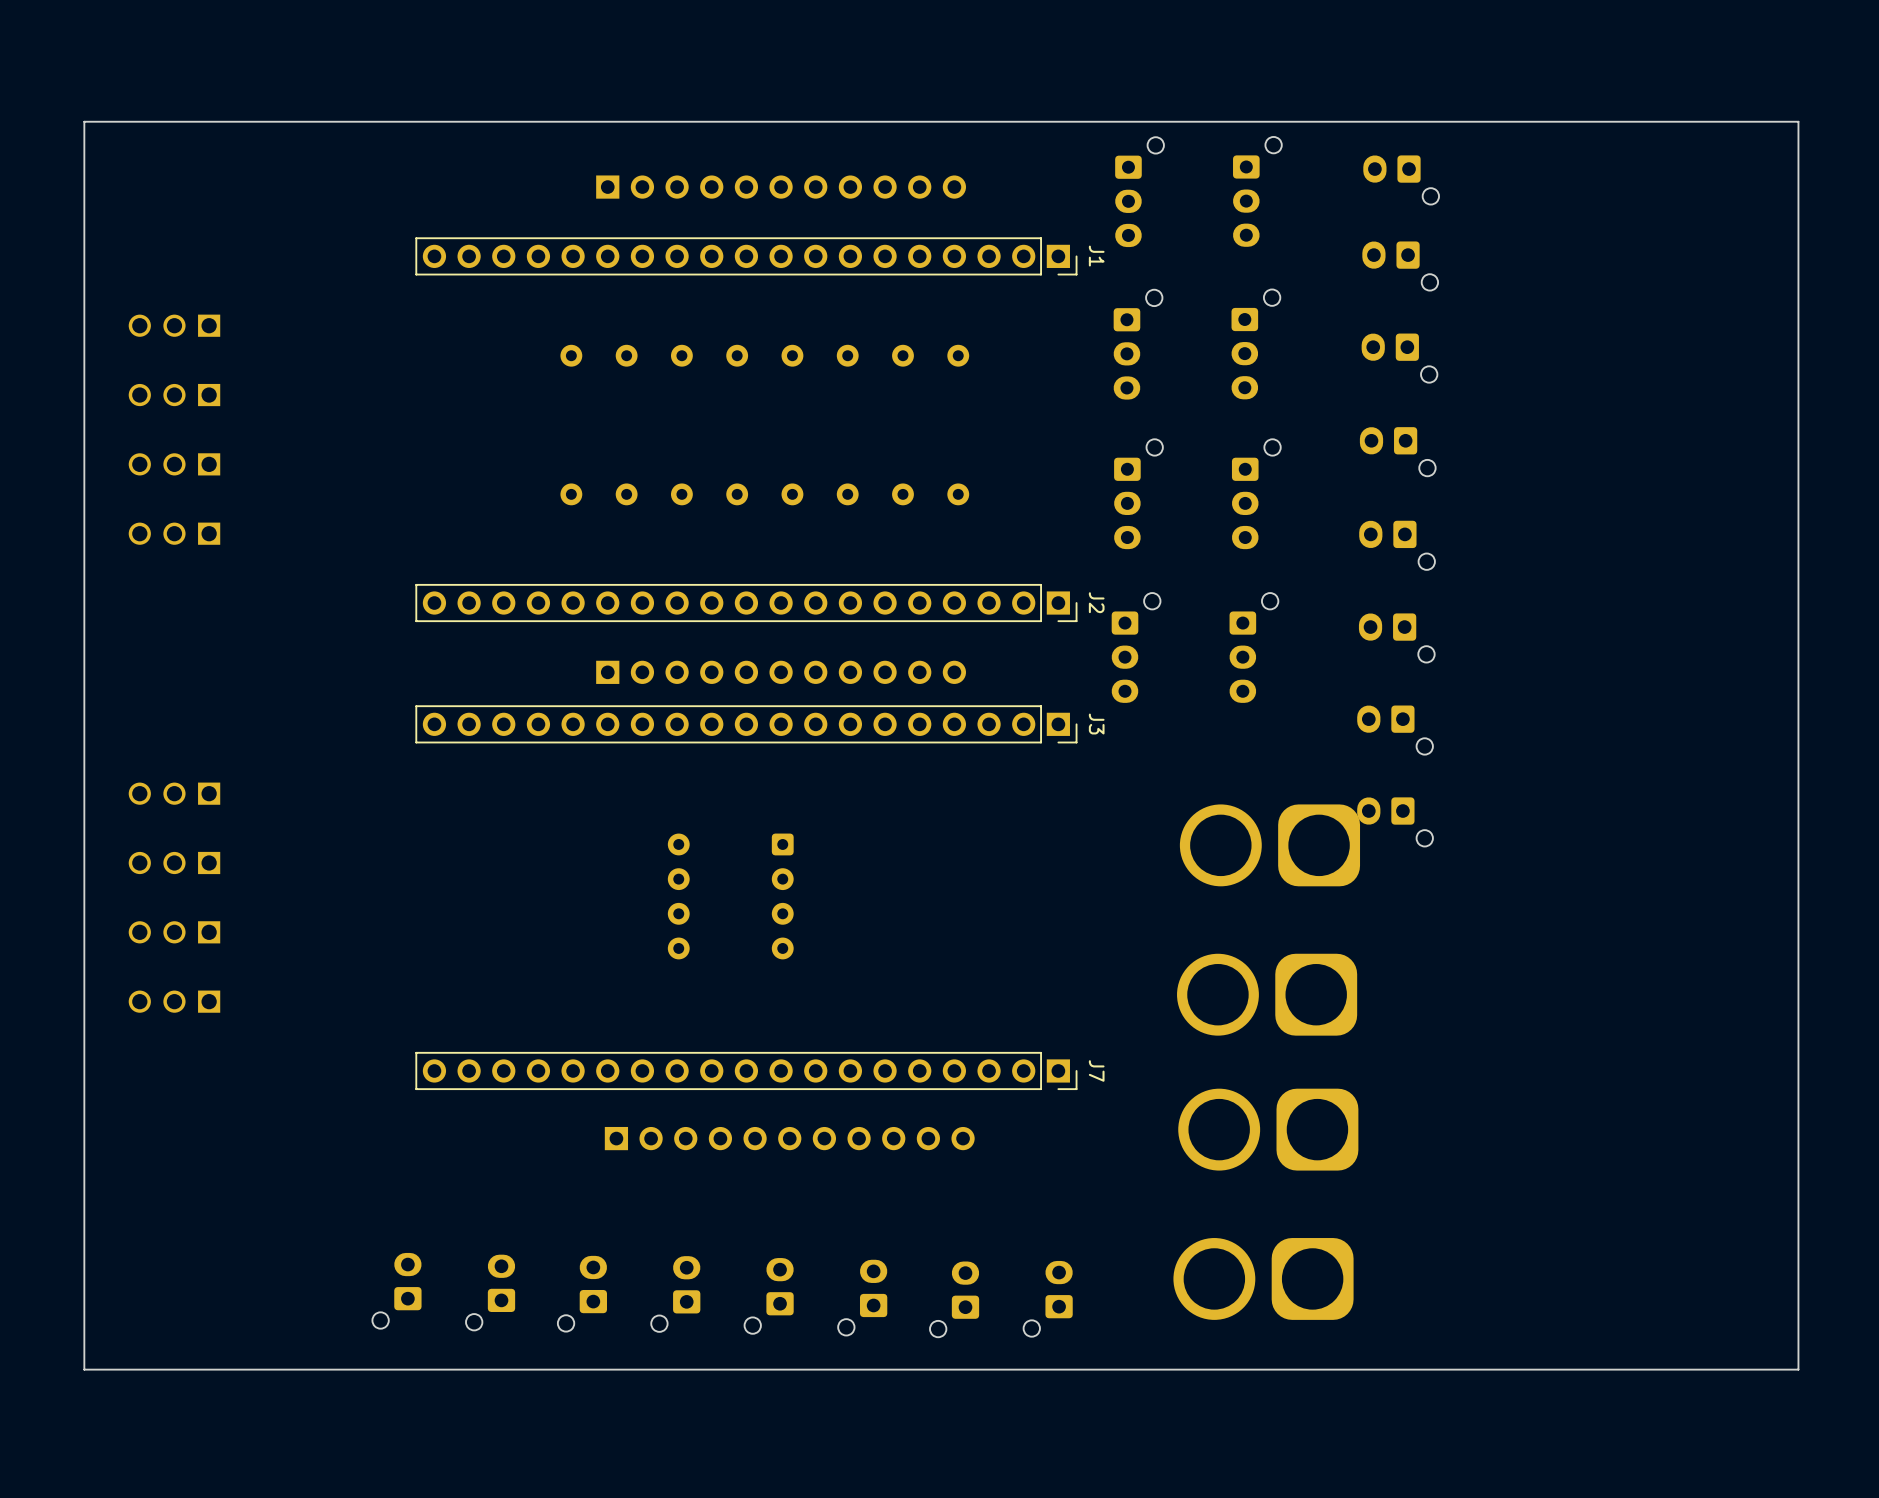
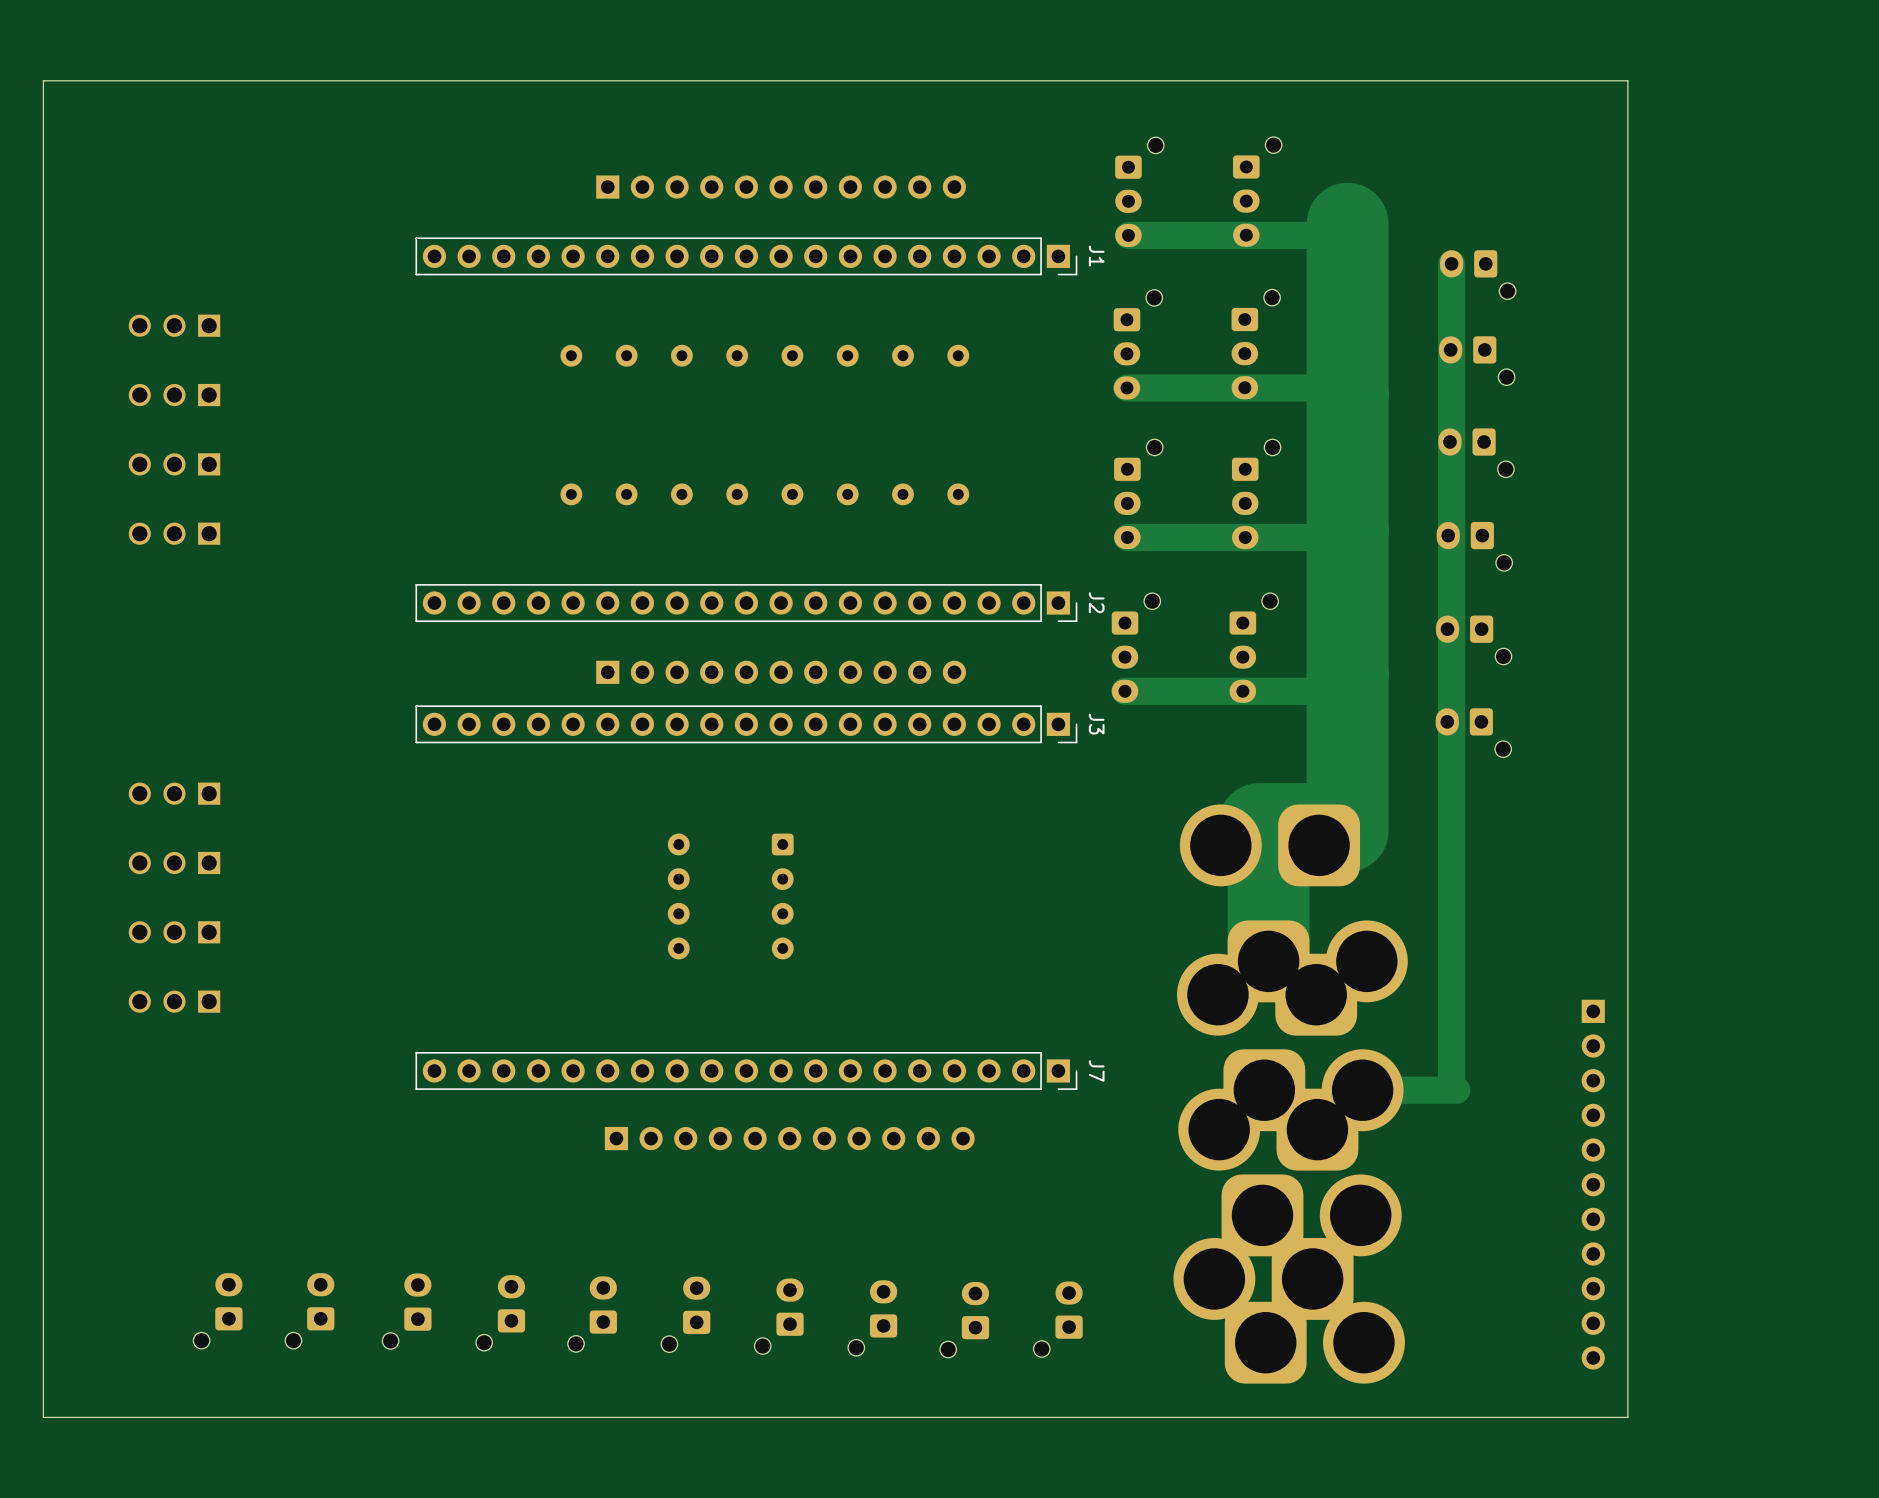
board edge: (1798, 121) (84, 121) (84, 1369) (1798, 1369) (1798, 121) -> (1627, 80) (1627, 1417) (43, 1417) (43, 80) (1627, 80)
part: (1401, 179) -> none
track: none -> (1354, 216) (1335, 235) (1128, 235)
track: none -> (1347, 223) (1347, 830) (1340, 824) (1258, 824) (1268, 833) (1268, 961)
track: none -> (1451, 263) (1451, 1078) (1456, 1083) (1456, 1090) (1362, 1090)
part: (1400, 266) -> none
part: none -> (1477, 274)
part: (1399, 358) -> none
part: none -> (1476, 360)
track: none -> (1126, 387) (1341, 387) (1347, 394)
part: (1397, 451) -> none
part: none -> (1476, 452)
track: none -> (1347, 530) (1340, 537) (1127, 537)
part: (1397, 545) -> none
part: none -> (1474, 546)
part: (1396, 637) -> none
part: none -> (1473, 640)
track: none -> (1347, 674) (1330, 691) (1125, 691)
part: (1395, 730) -> none
part: none -> (1473, 732)
part: (1395, 821) -> none
part: none -> (1317, 961)
part: none -> (1313, 1090)
part: none -> (1593, 1184)
part: none -> (1311, 1215)
part position: (396, 1290) -> (406, 1311)
part position: (490, 1292) -> (500, 1313)
part position: (582, 1293) -> (592, 1314)
part position: (675, 1294) -> (685, 1314)
part position: (769, 1295) -> (779, 1316)
part position: (862, 1297) -> (872, 1318)
part position: (1048, 1298) -> (1058, 1319)
part position: (954, 1299) -> (964, 1319)
part: none -> (217, 1310)
part: none -> (309, 1310)
part: none -> (1314, 1342)

